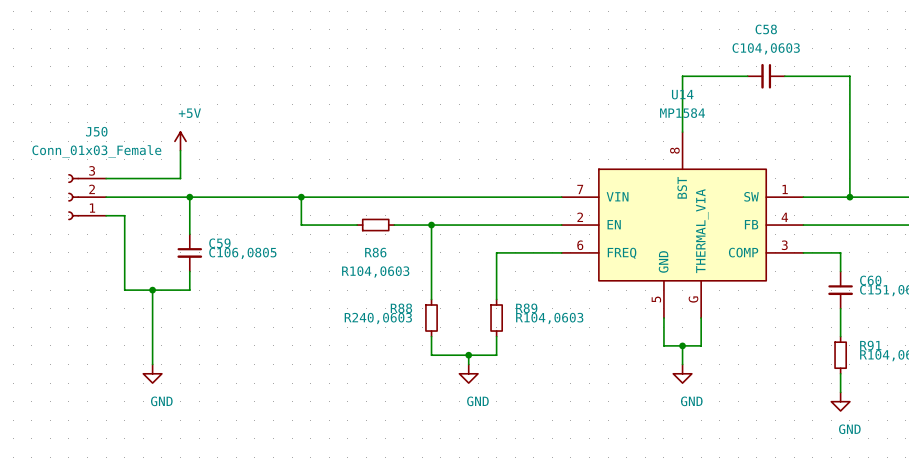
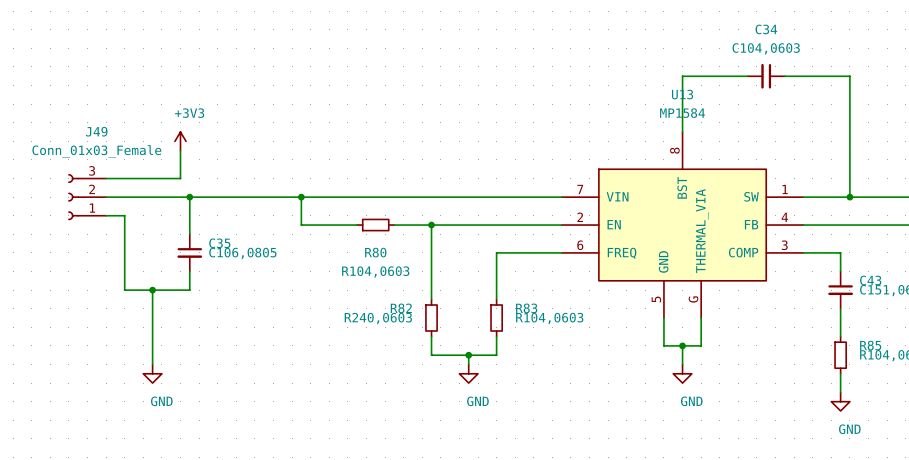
C58 name: C58 (766, 29) -> C34 (766, 29)
U14 name: U14 (682, 94) -> U13 (682, 94)
J50 name: J50 (96, 131) -> J49 (96, 131)
power symbol: +5V (180, 141) -> +3V3 (180, 141)
C59 name: C59 (219, 243) -> C35 (219, 243)
R86 name: R86 (375, 252) -> R80 (375, 252)
C60 name: C60 (870, 280) -> C43 (870, 280)
R88 name: R88 (401, 308) -> R82 (401, 308)
R89 name: R89 (526, 308) -> R83 (526, 308)
R91 name: R91 (870, 345) -> R85 (870, 345)

